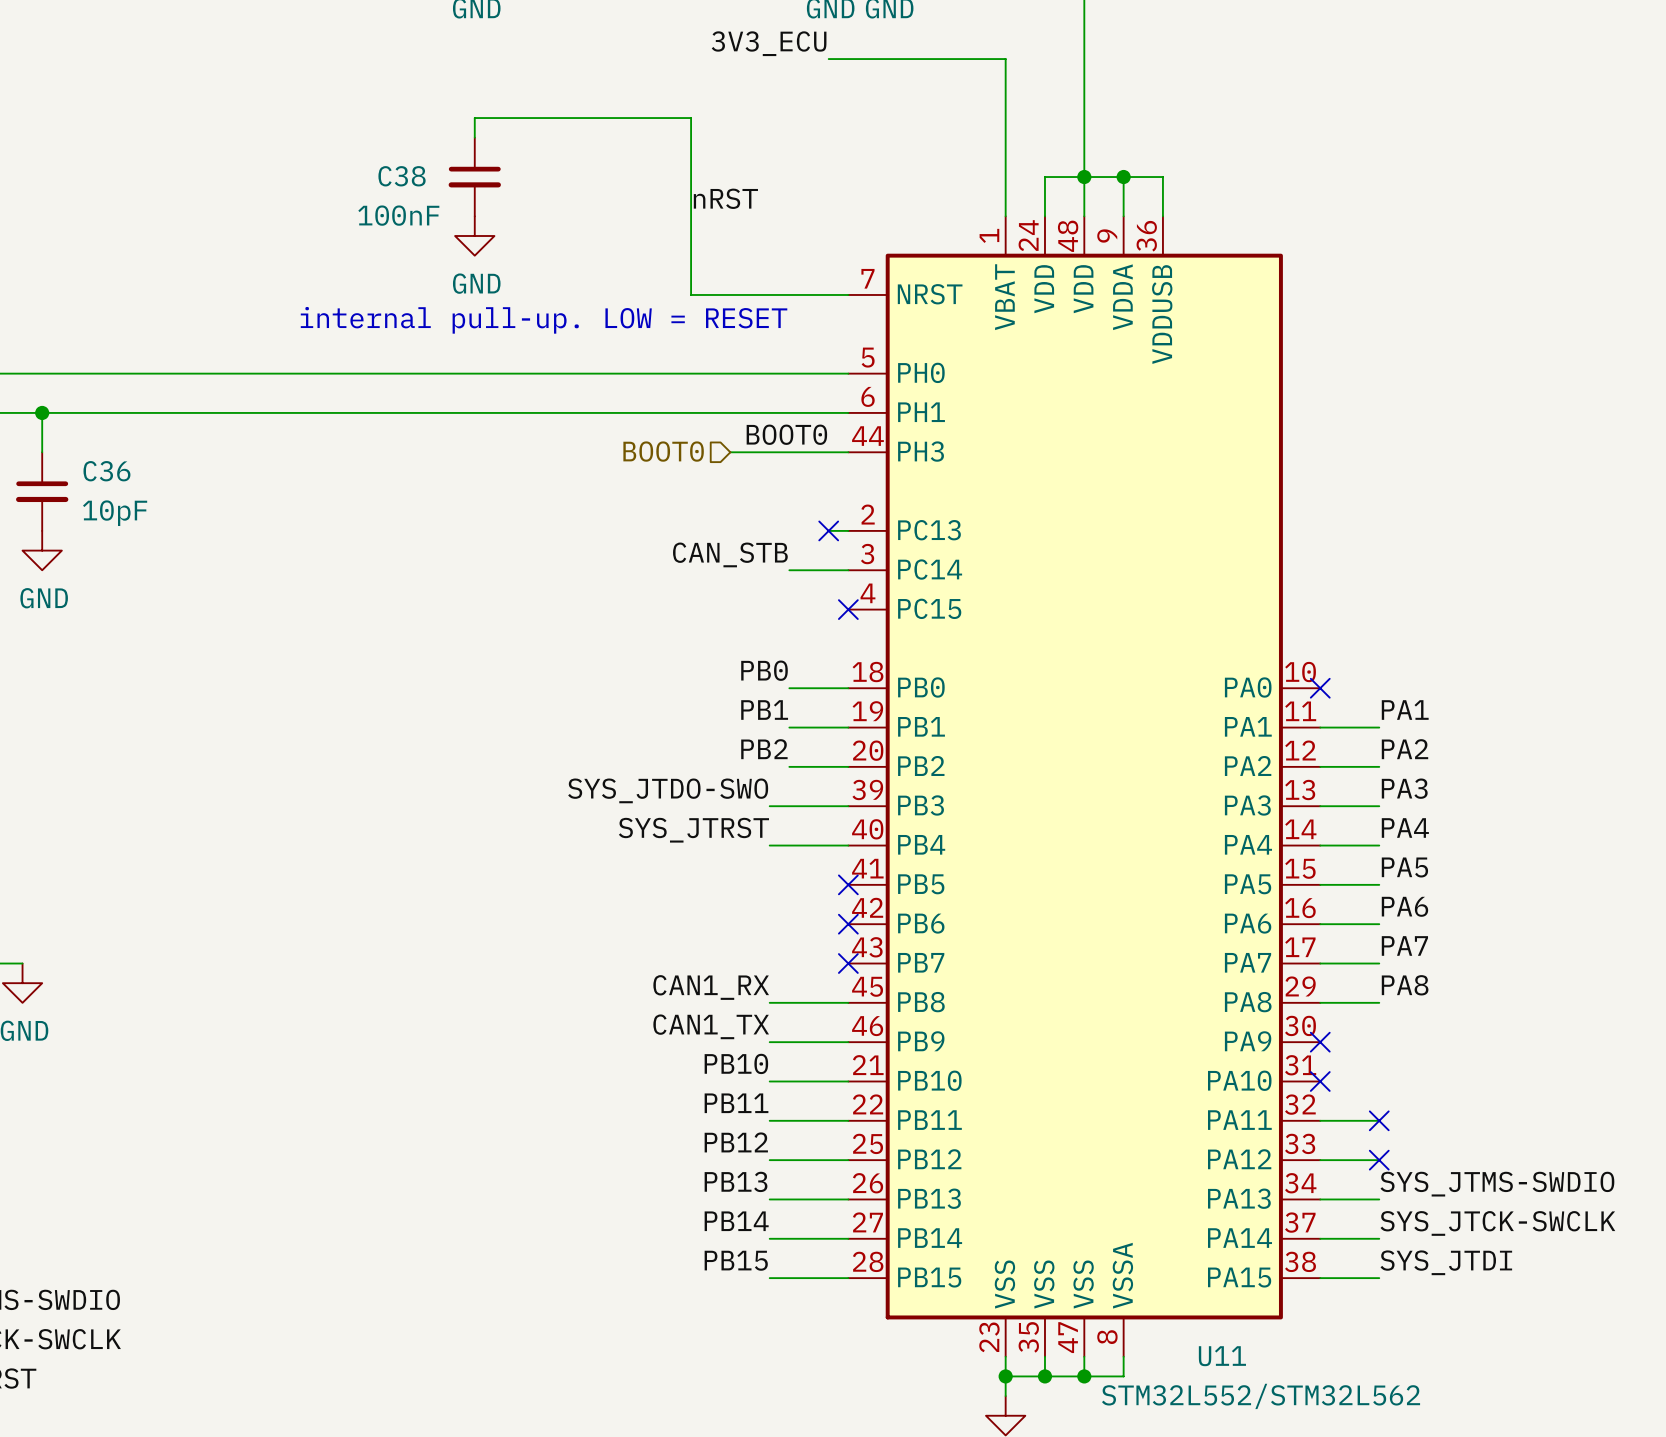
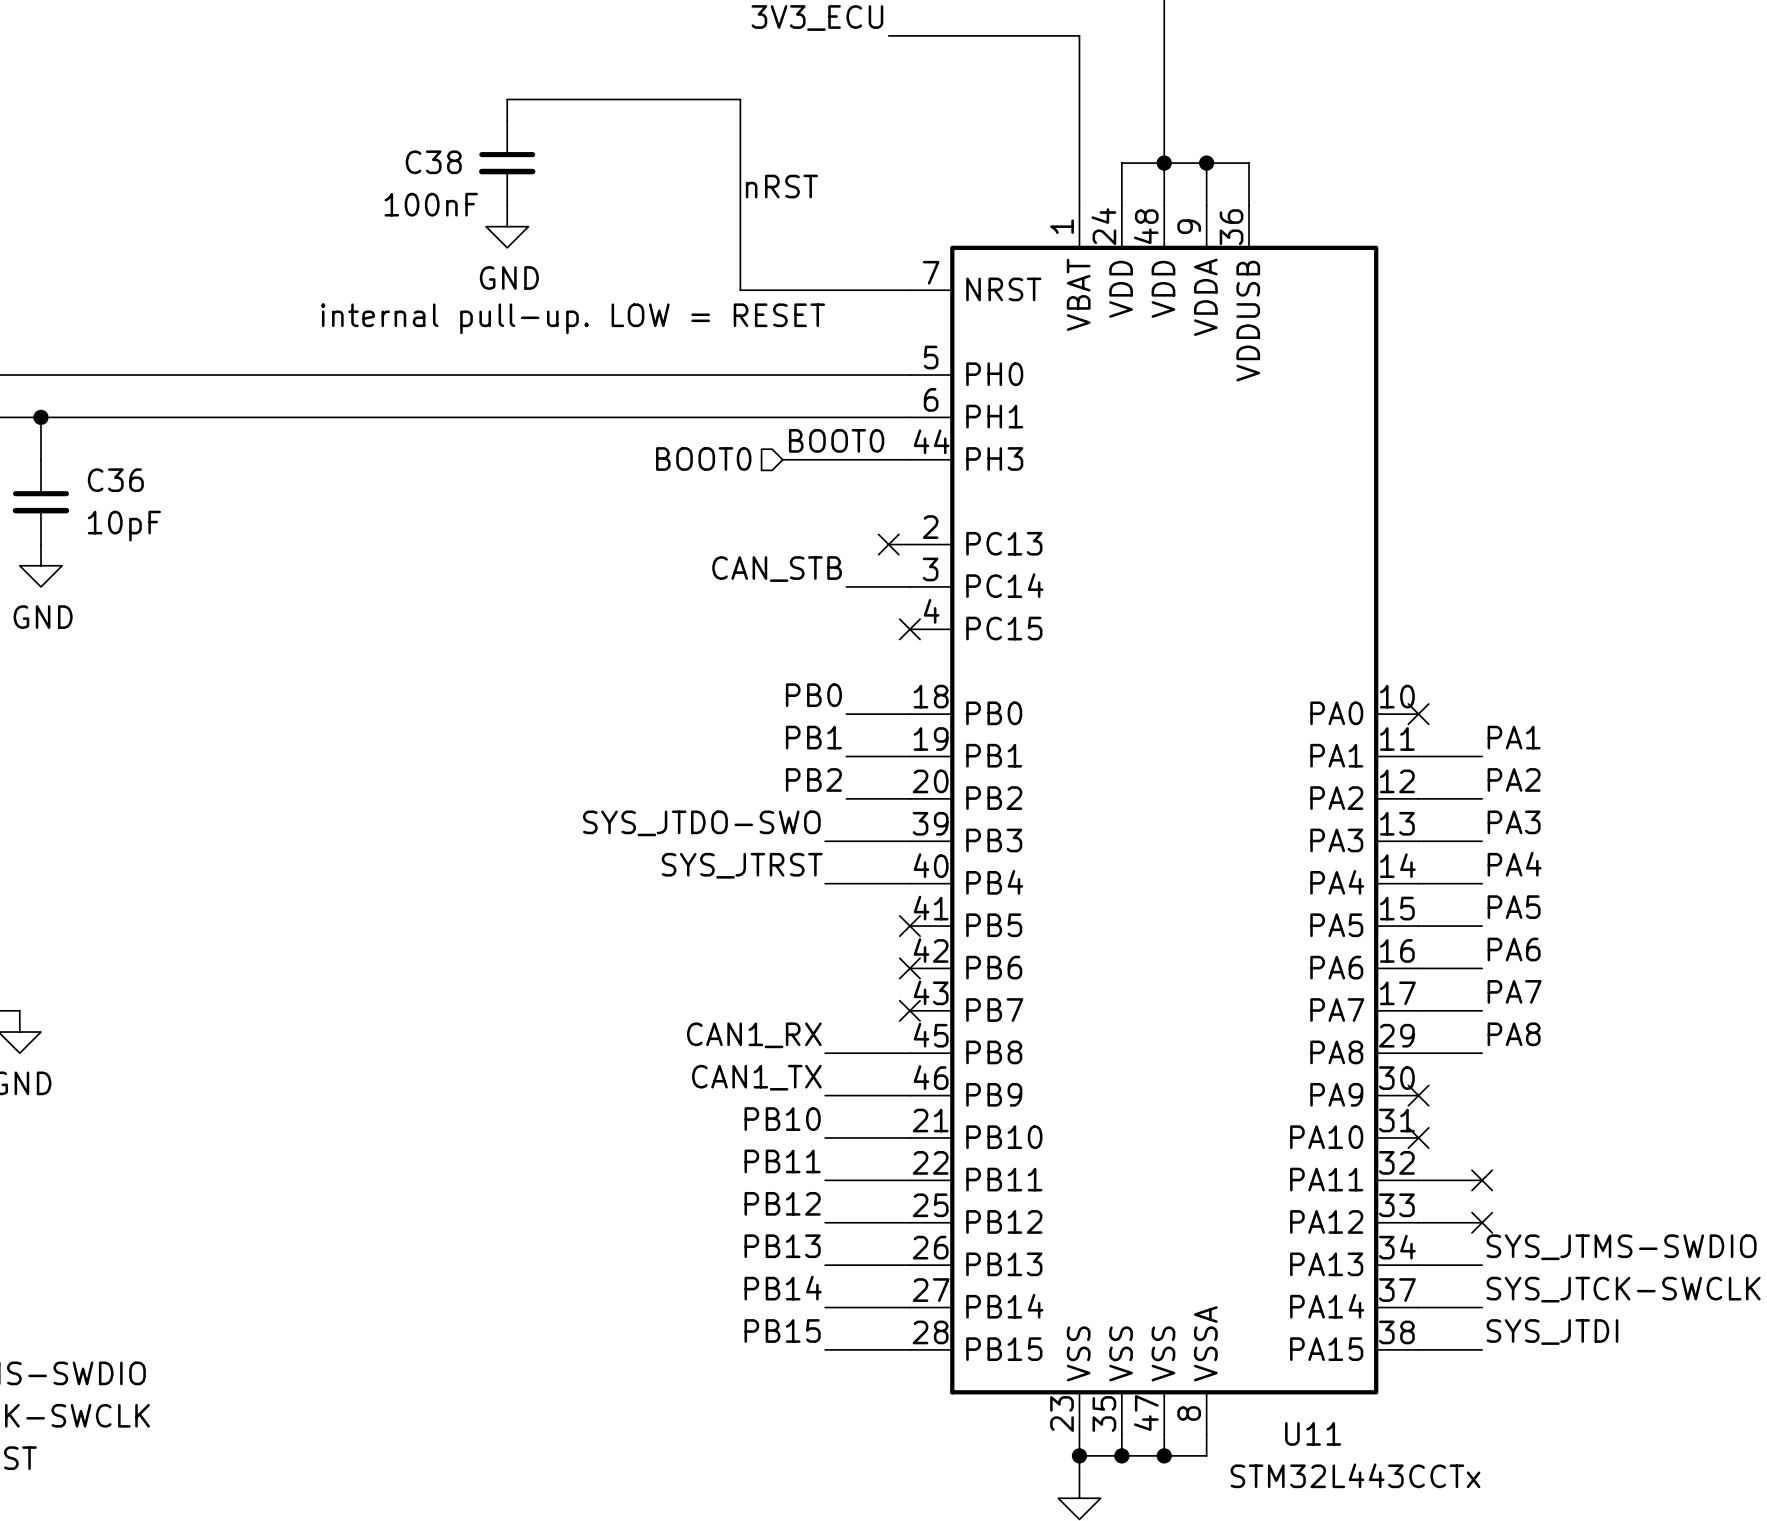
U11 value: STM32L552/STM32L562 (1261, 1396) -> STM32L443CCTx (1355, 1475)

